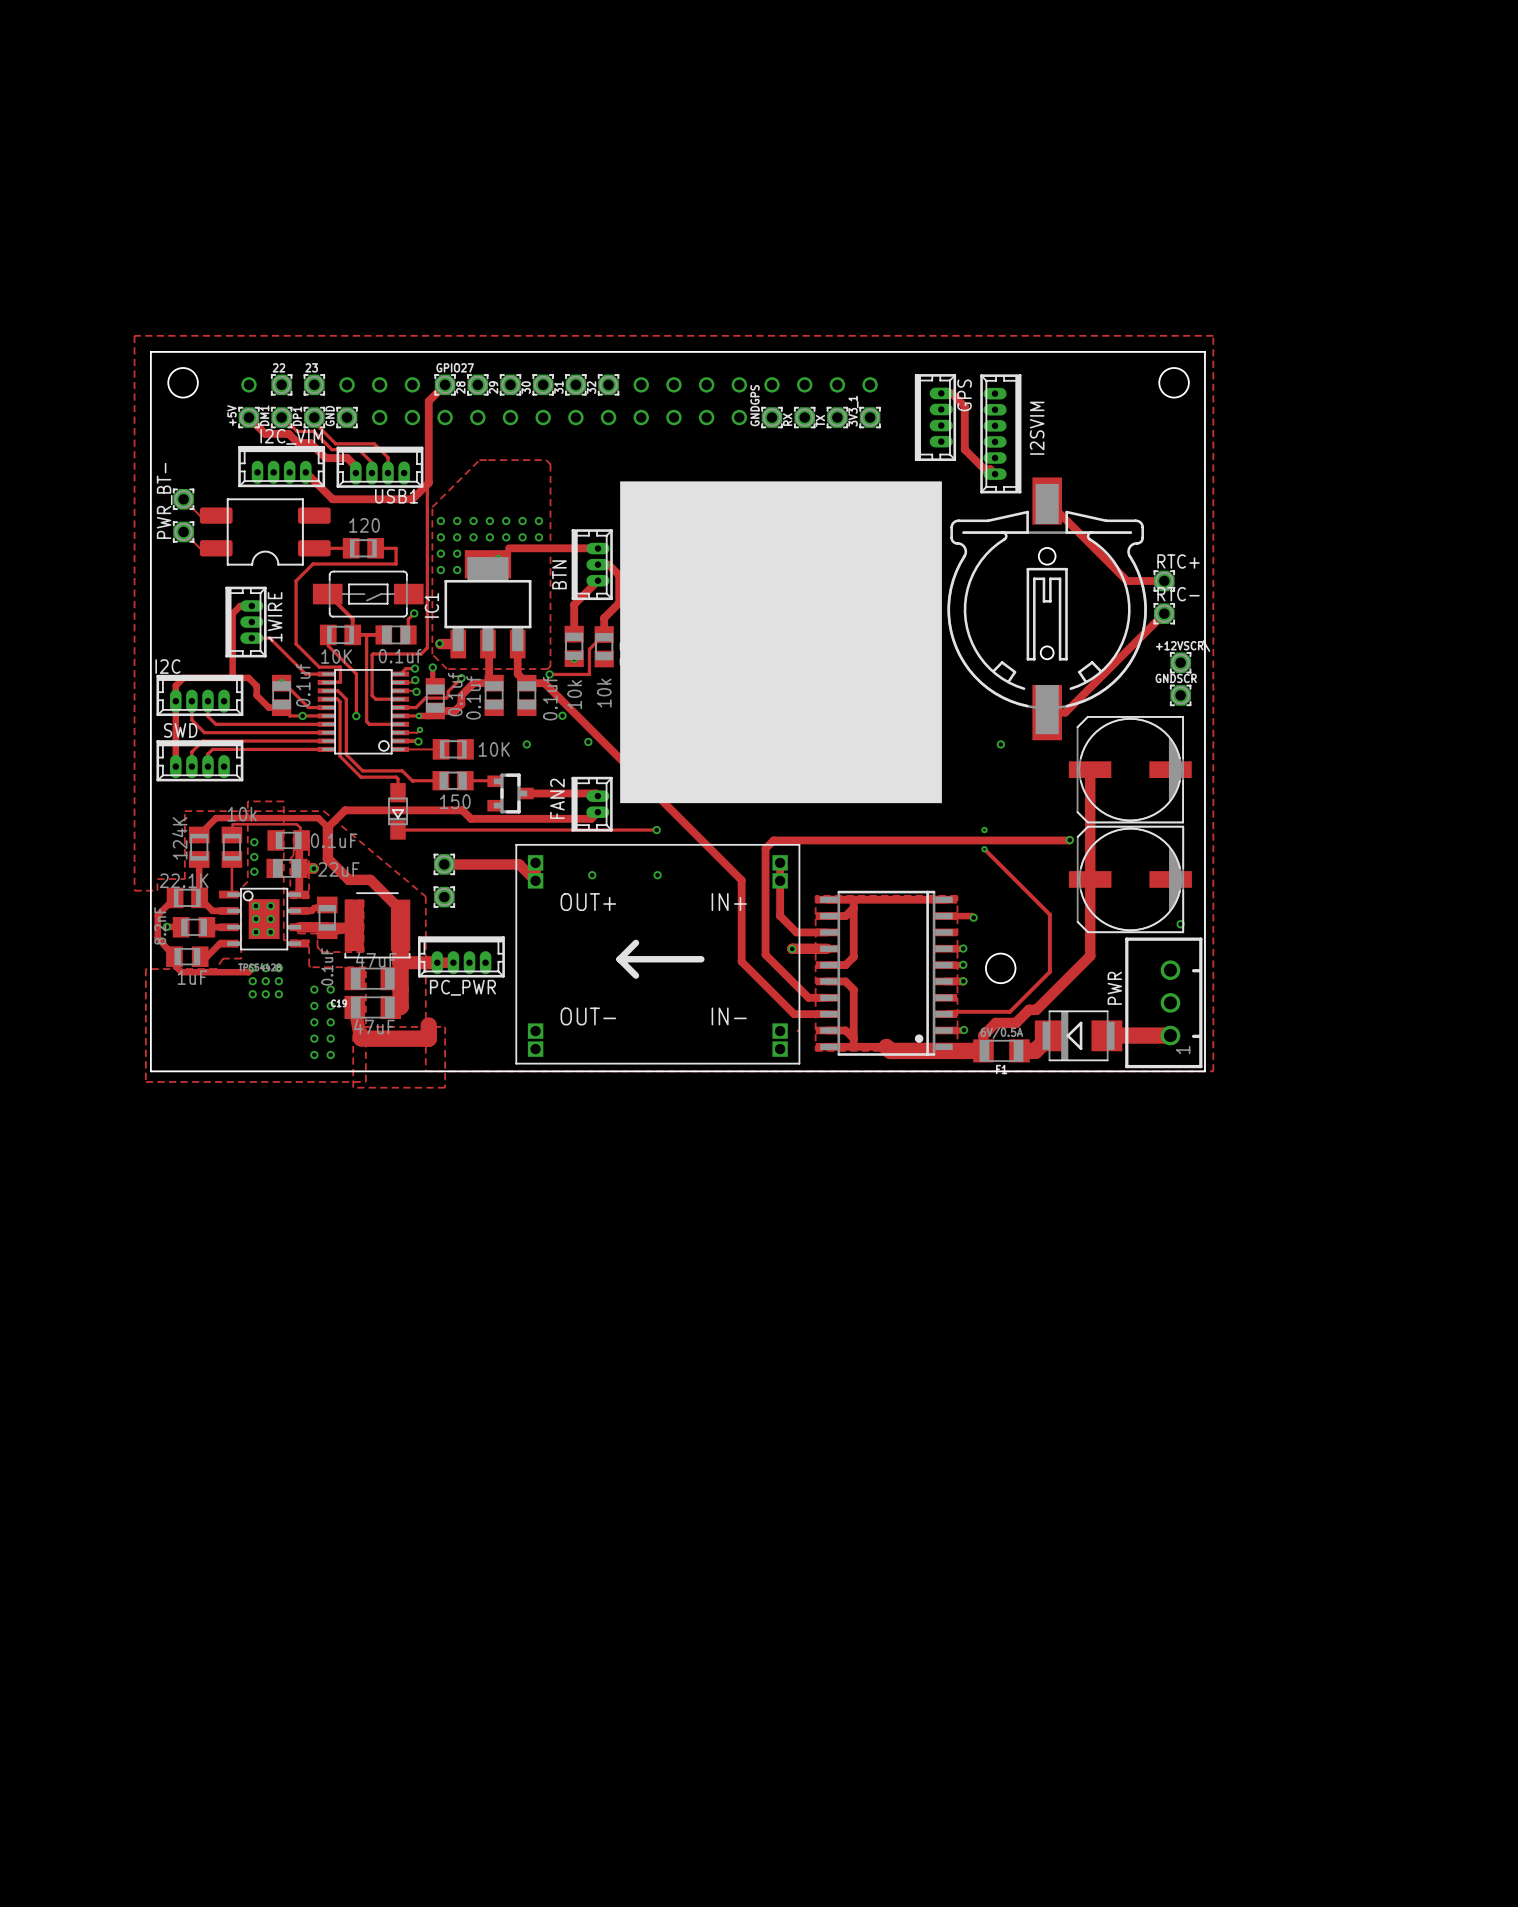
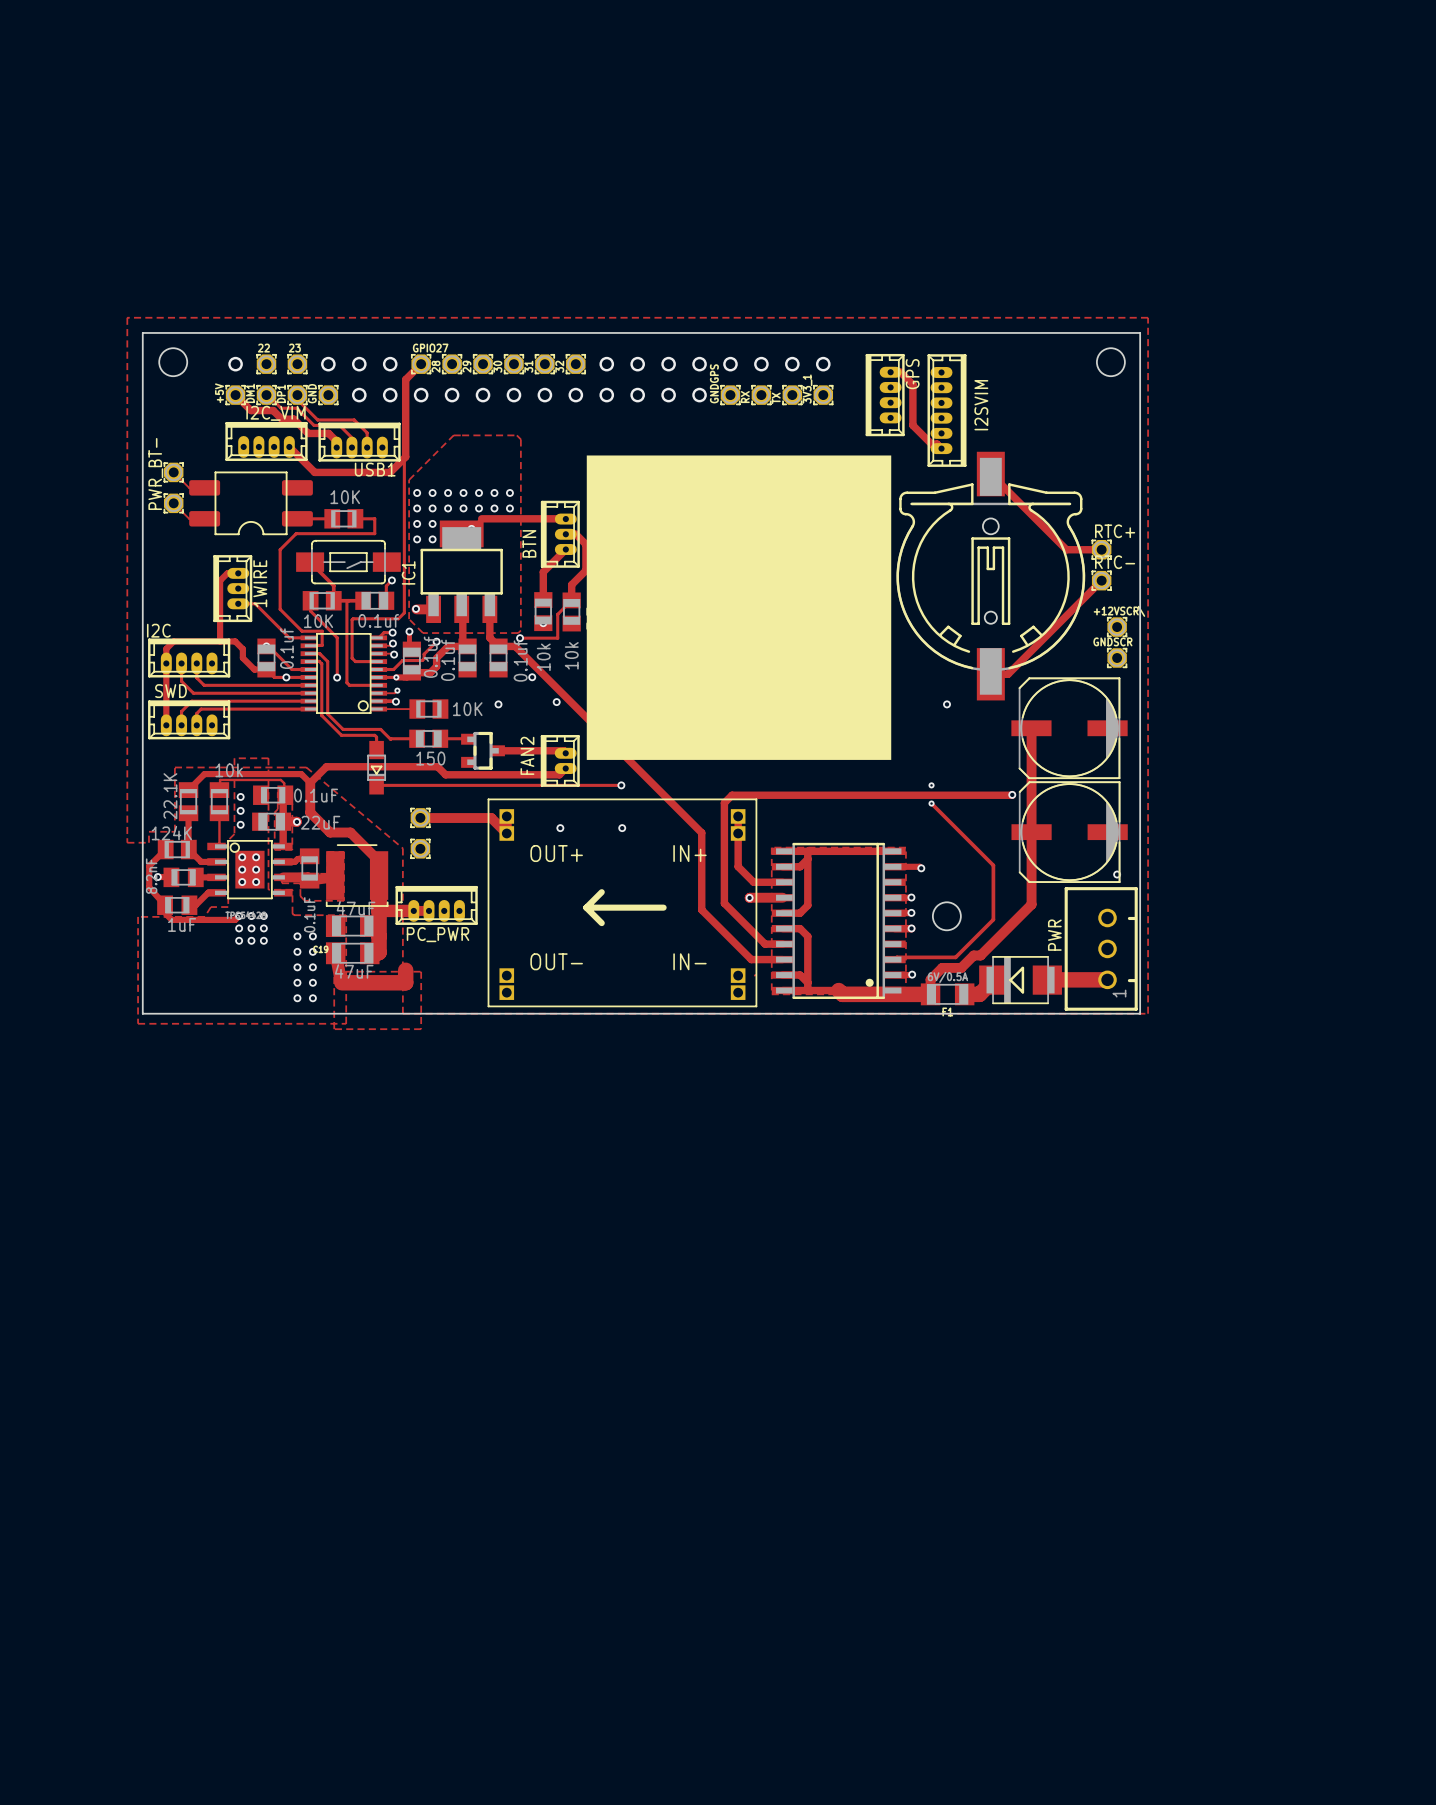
part value: 120 (364, 525) -> 10K (345, 497)
part value: 124K (179, 838) -> 22.1K (170, 796)
part value: 22.1К (184, 880) -> 124K (171, 833)

